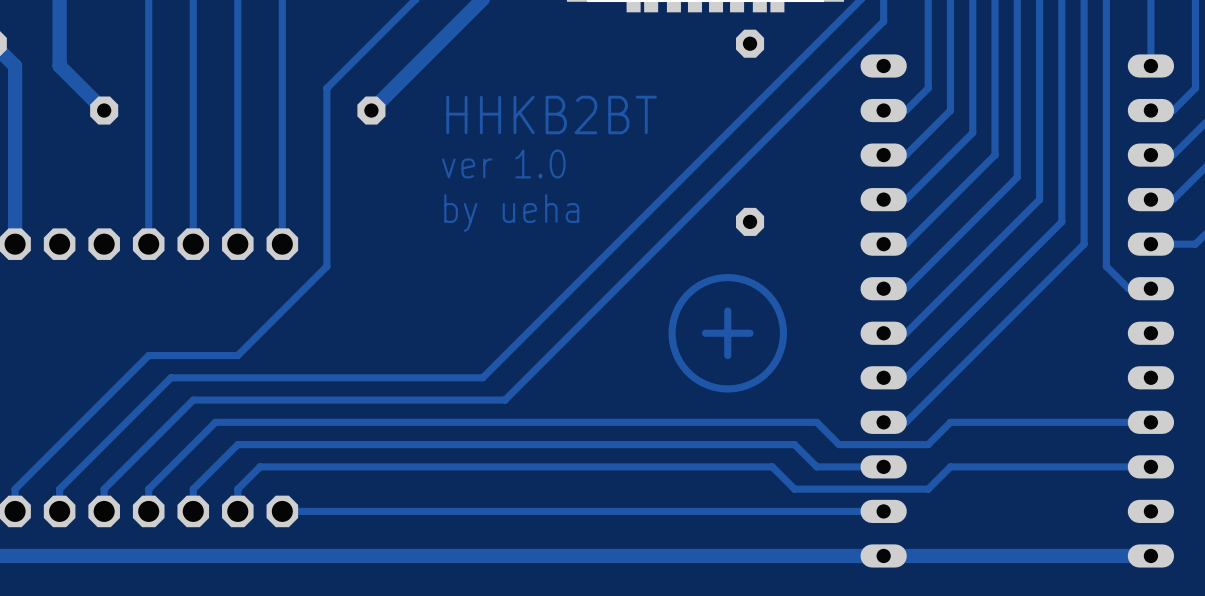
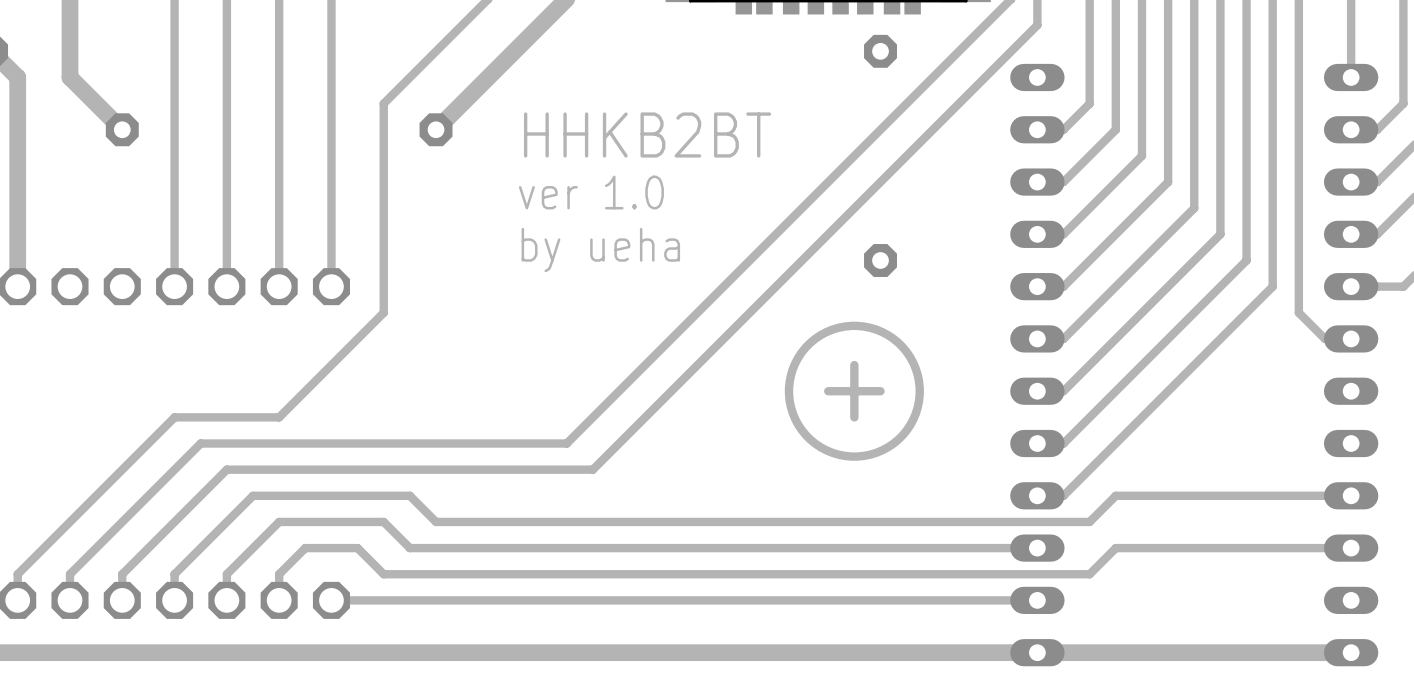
track: (349, 422) (816, 422) (839, 444) -> none
track: (371, 444) (326, 444) -> (436, 521) (409, 495)
track: (794, 444) (816, 466) -> (932, 521) (985, 521)
track: none -> (357, 548) (383, 574) (932, 574)
track: (349, 466) (304, 466) -> (409, 548) (383, 521)
track: (772, 466) (794, 489) -> (906, 548) (958, 548)

